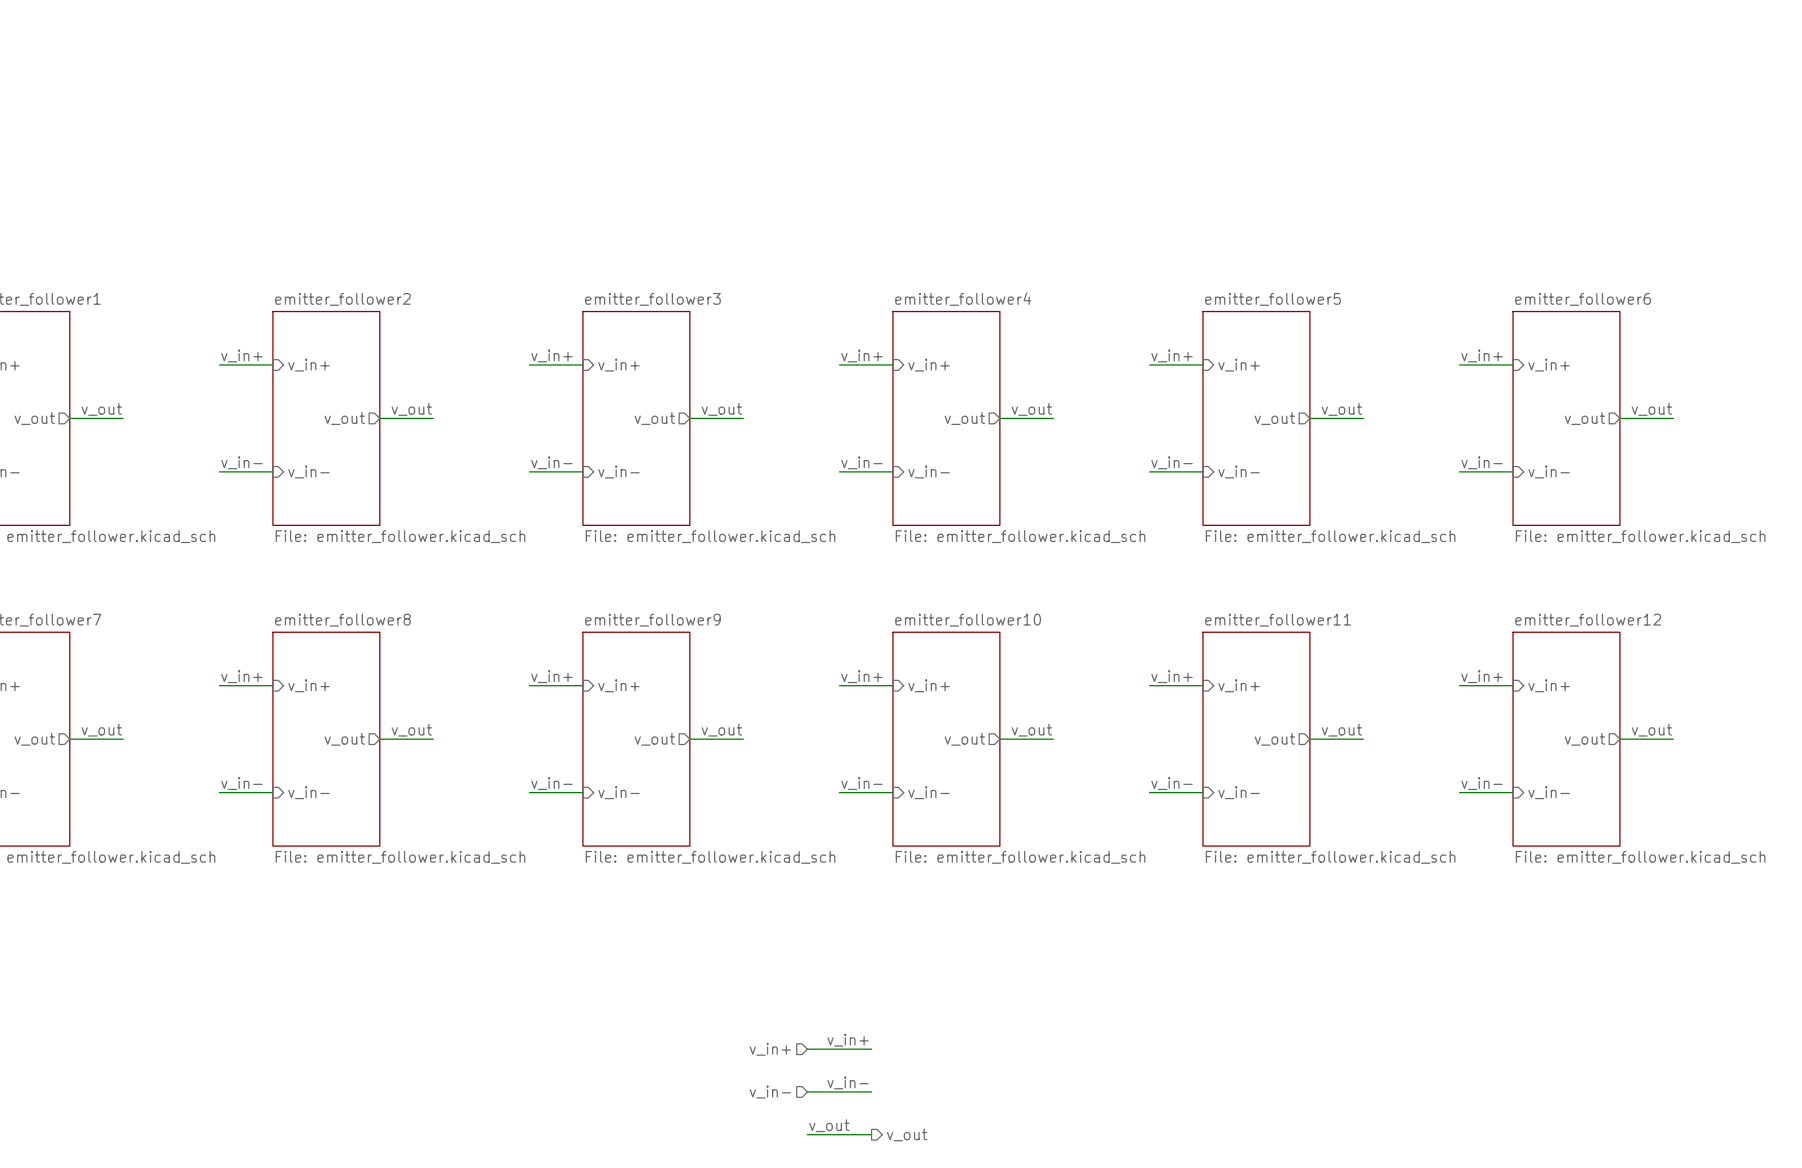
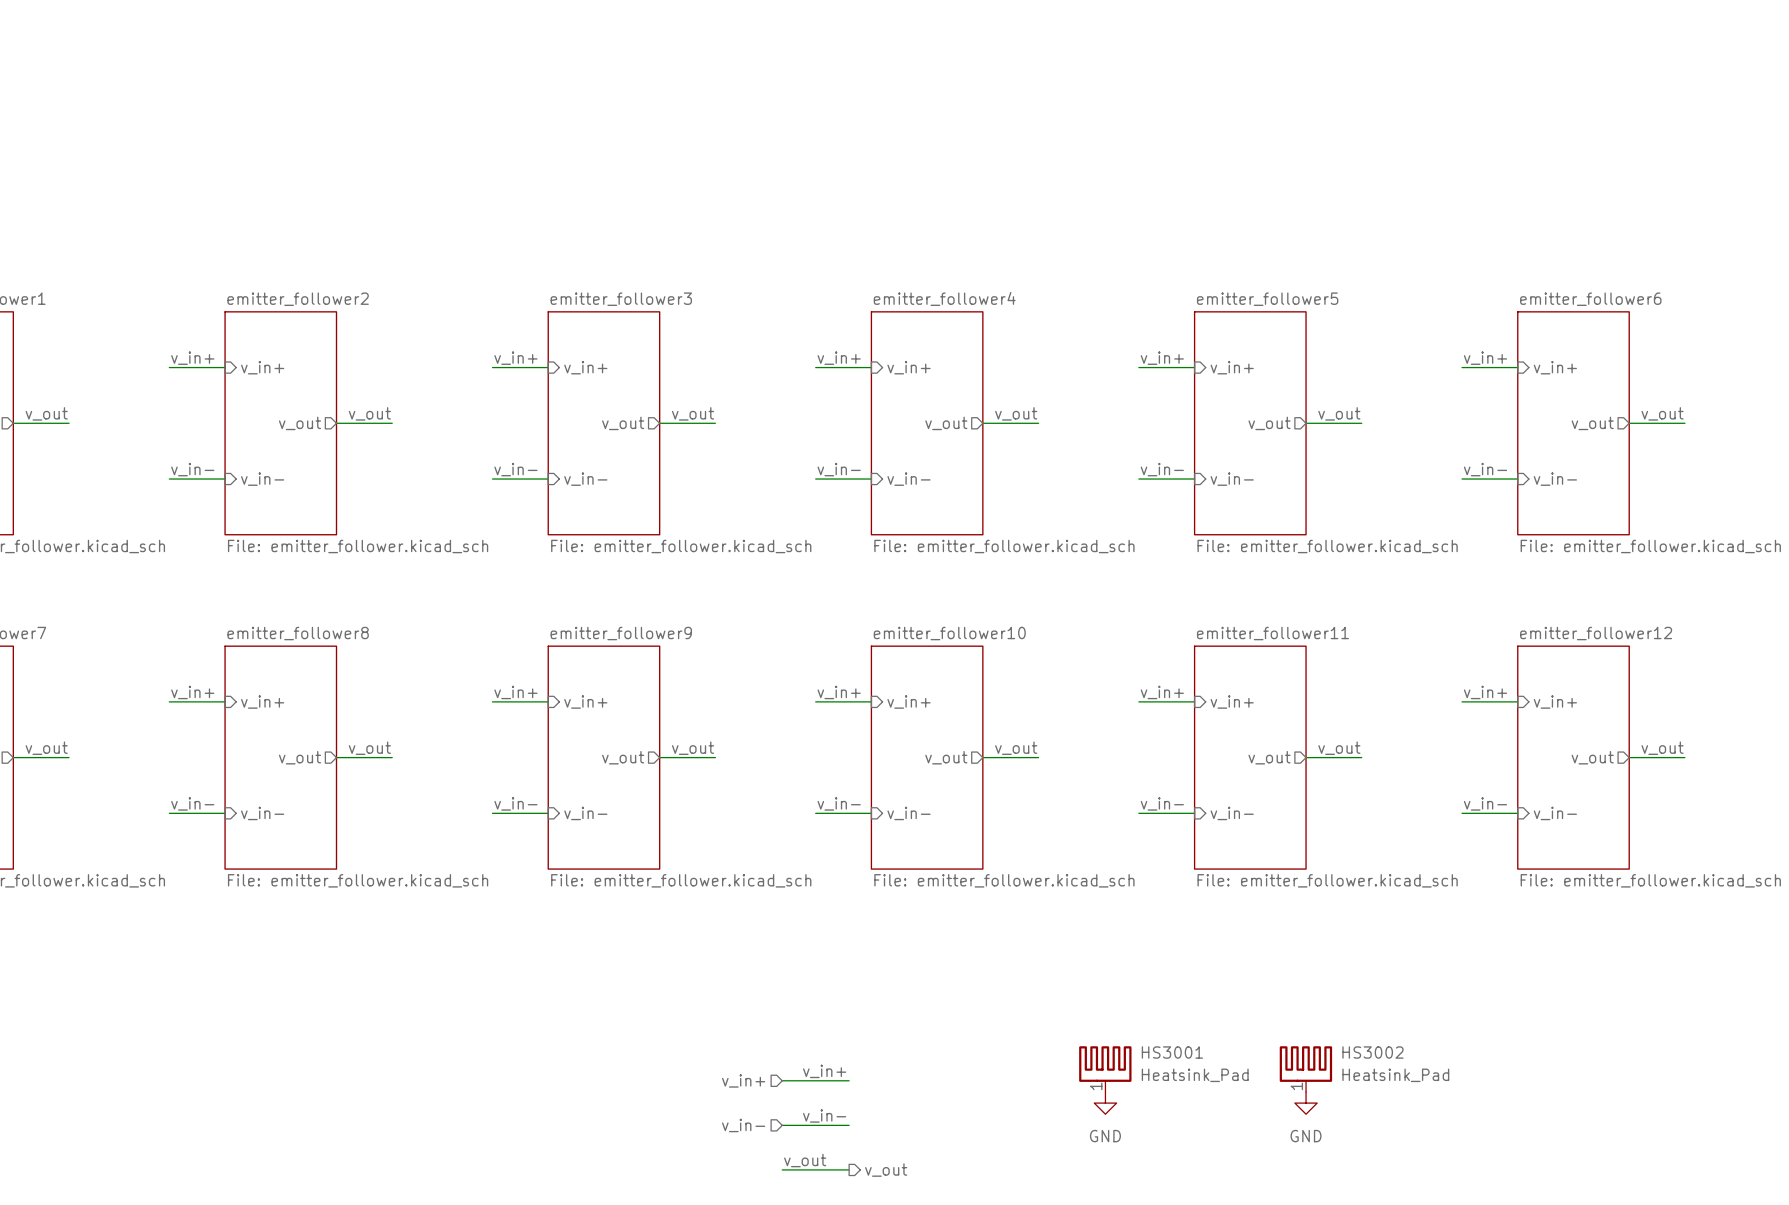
HS3001: none -> Heatsink_Pad (1105, 1069)
HS3002: none -> Heatsink_Pad (1305, 1069)
power symbol: none -> GND (1105, 1103)
power symbol: none -> GND (1306, 1103)

